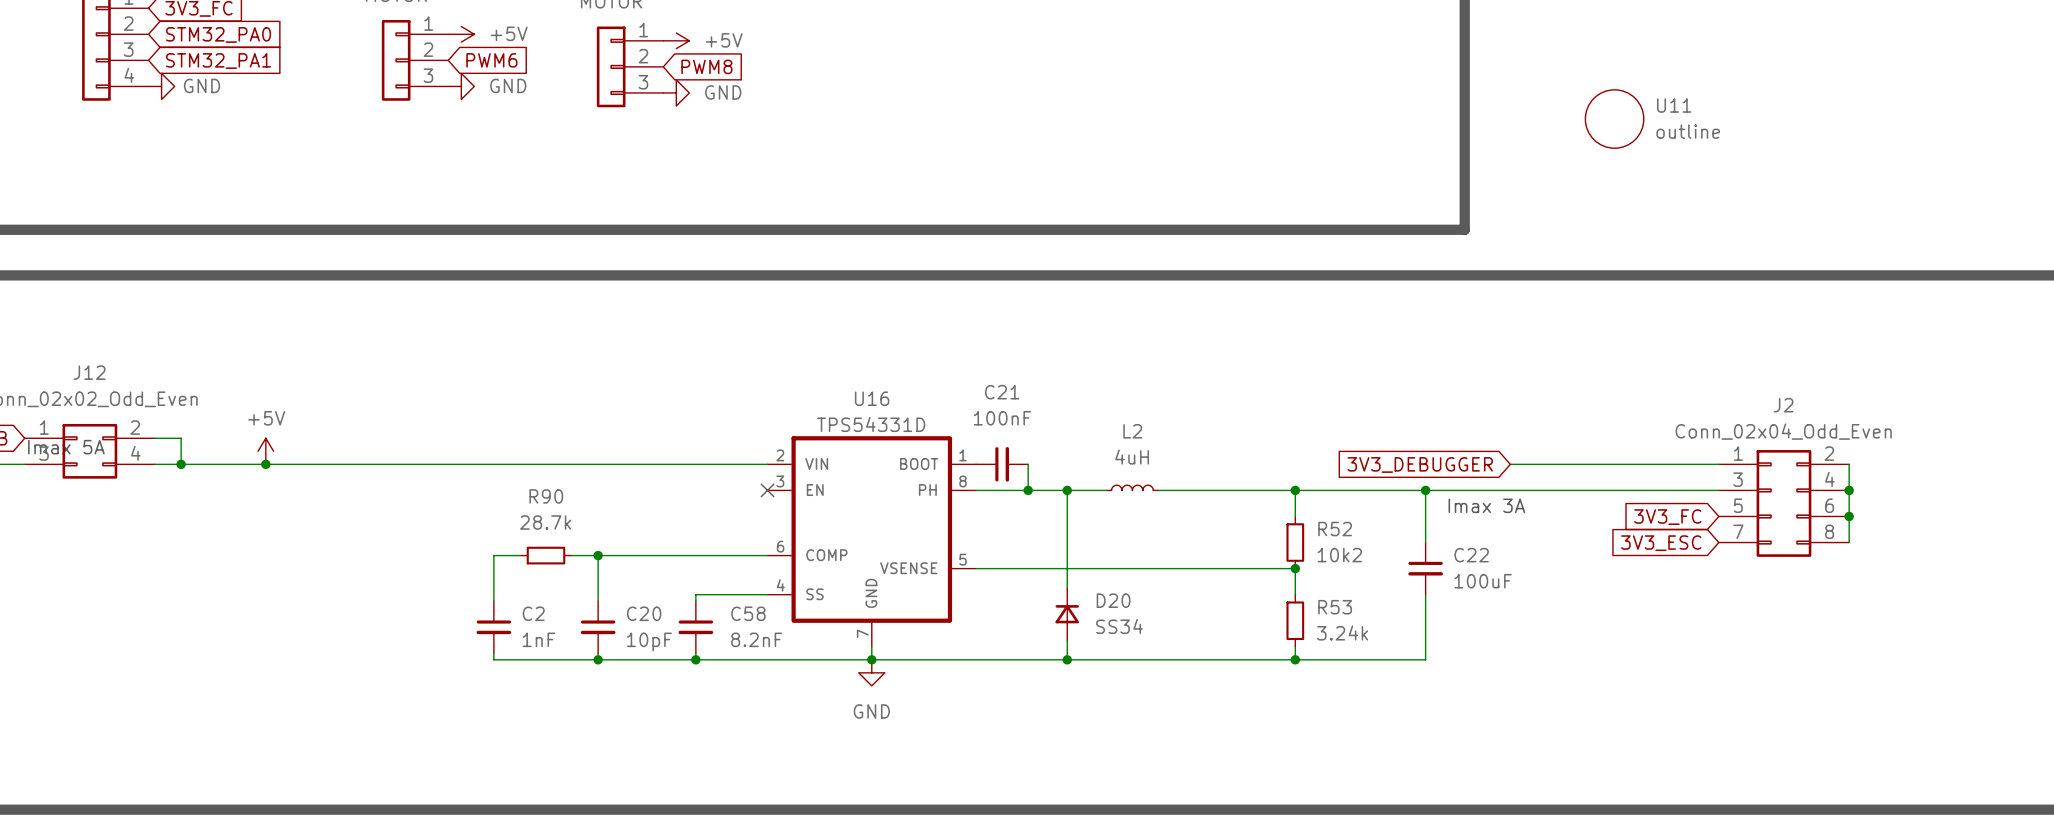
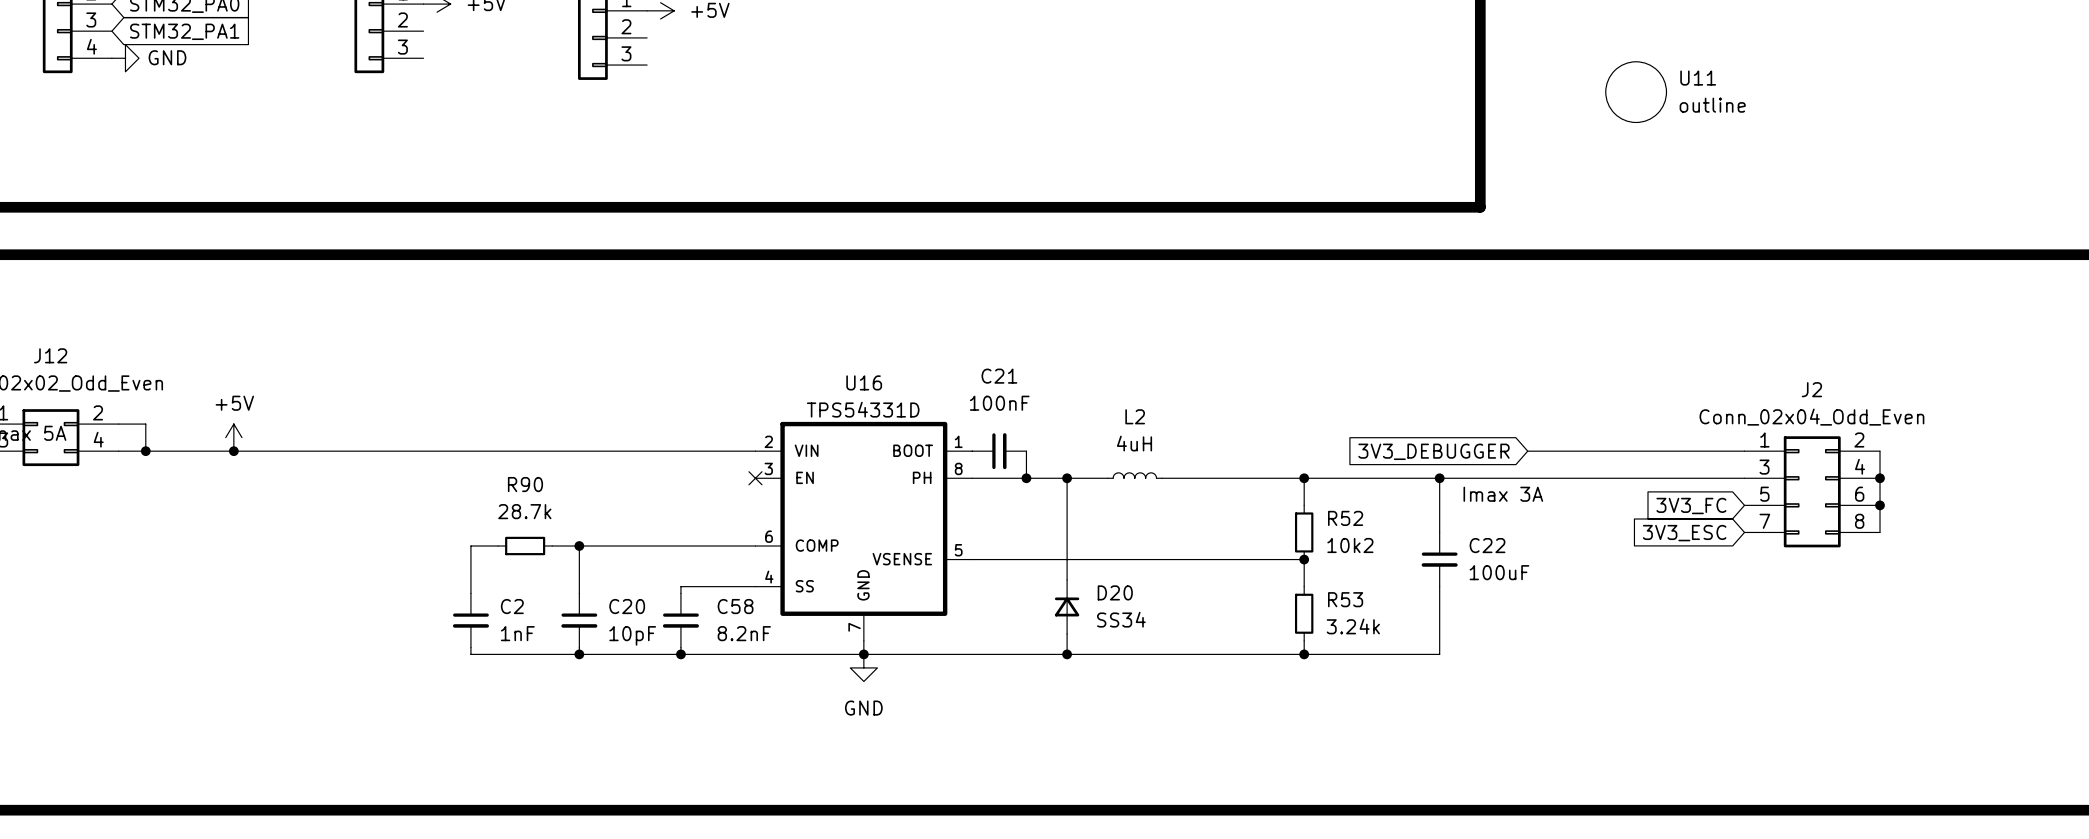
global label: PWM6 (491, 60) -> none
global label: PWM8 (706, 66) -> none
power symbol: GND (461, 86) -> none
power symbol: GND (676, 92) -> none

